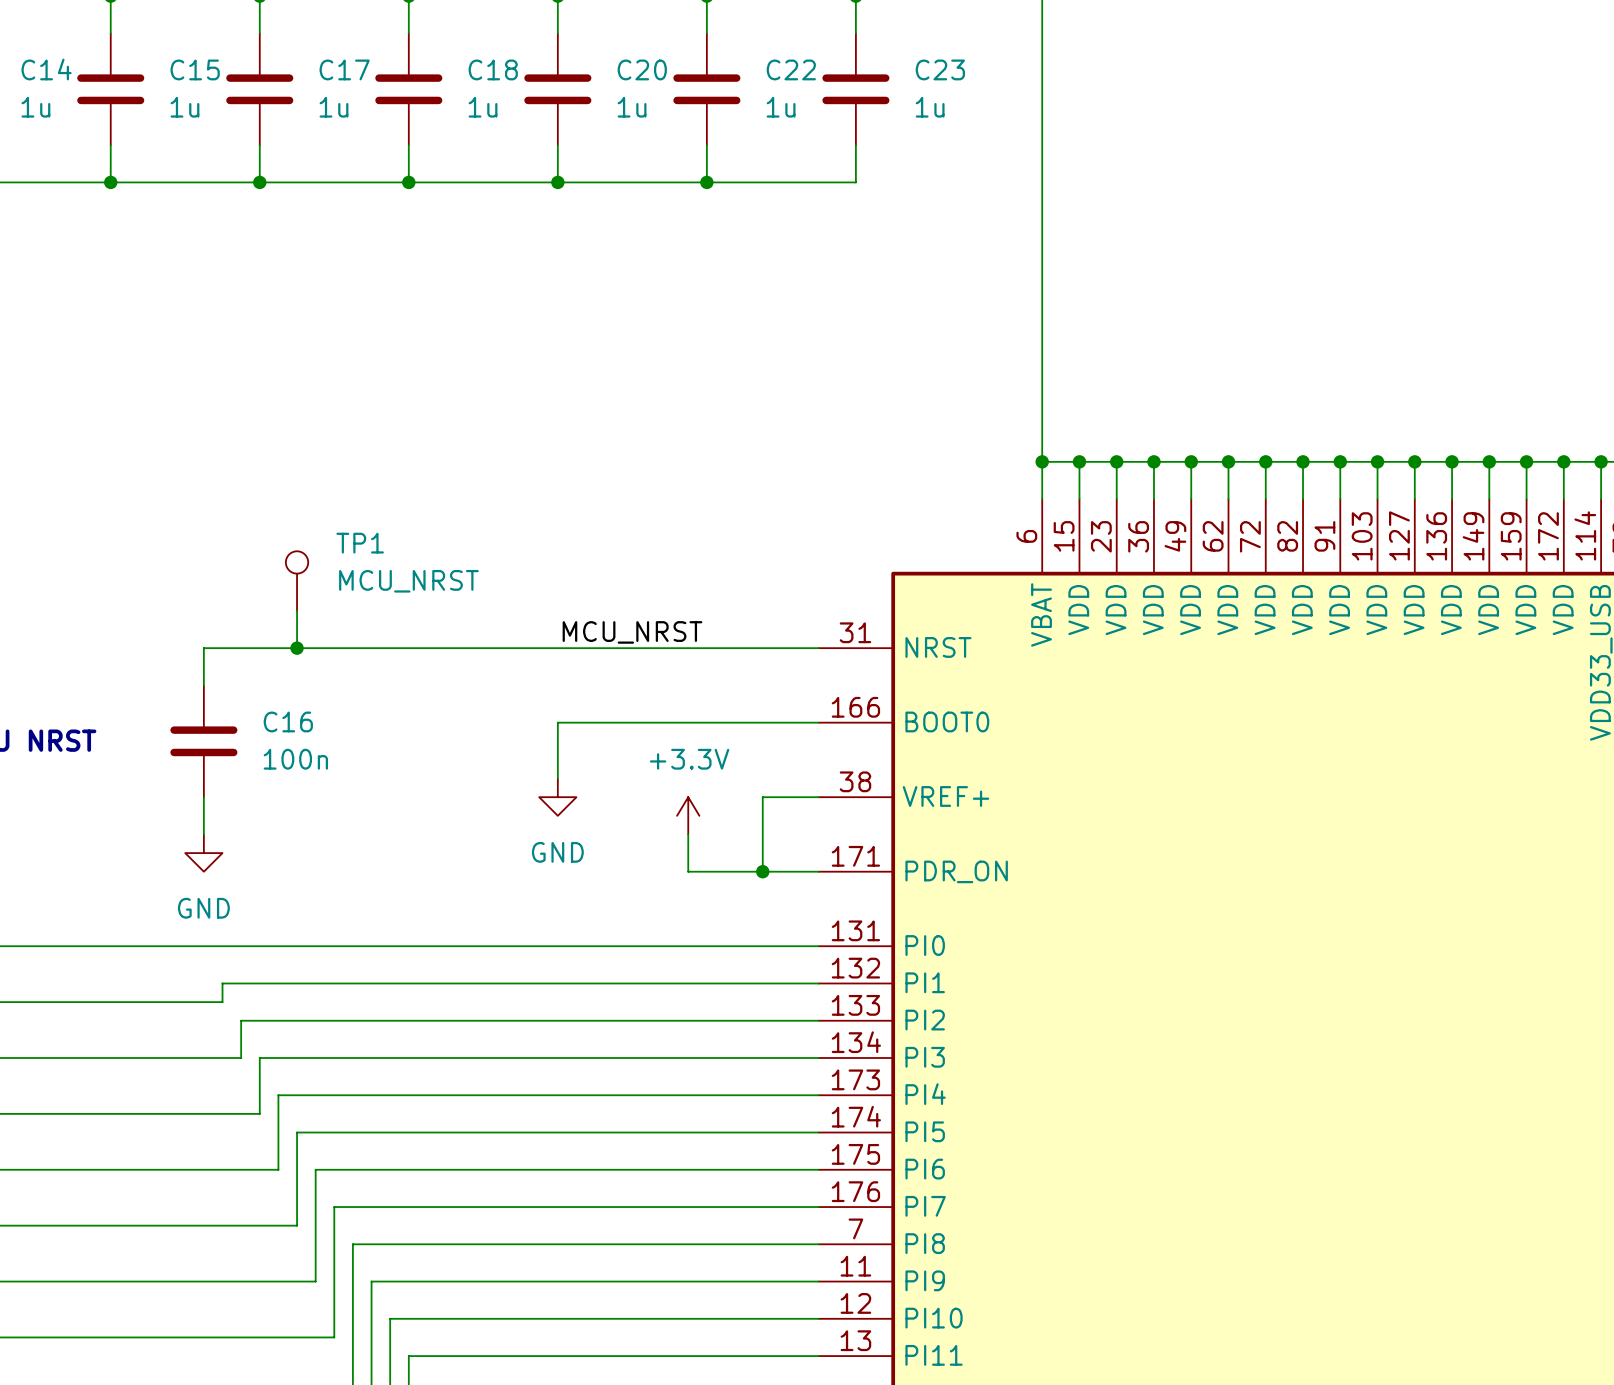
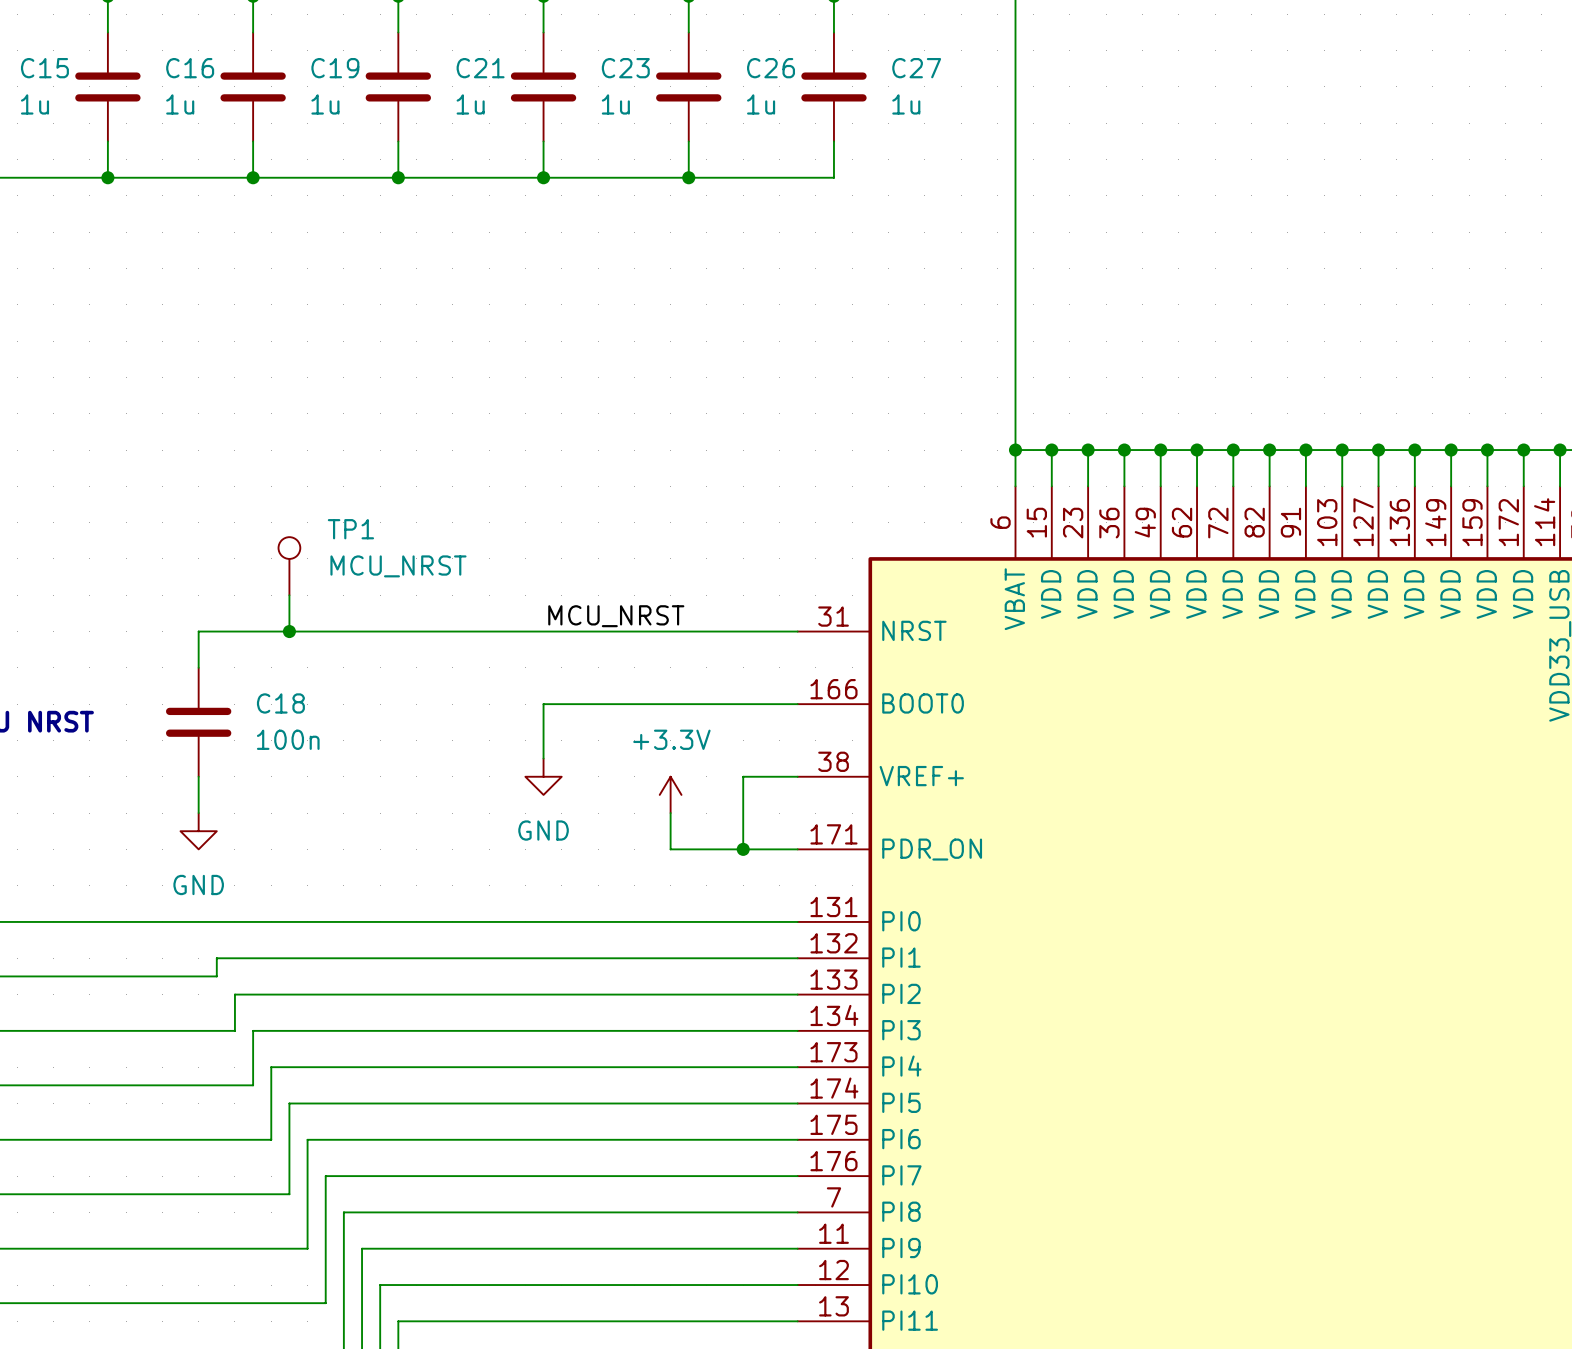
C14 name: C14 (46, 69) -> C15 (44, 68)
C15 name: C15 (195, 69) -> C16 (190, 68)
C17 name: C17 (344, 69) -> C19 (335, 68)
C18 name: C18 (493, 69) -> C21 (480, 68)
C20 name: C20 (642, 69) -> C23 (625, 68)
C22 name: C22 (791, 69) -> C26 (771, 68)
C23 name: C23 (940, 69) -> C27 (916, 68)
C16 name: C16 (288, 721) -> C18 (280, 703)

